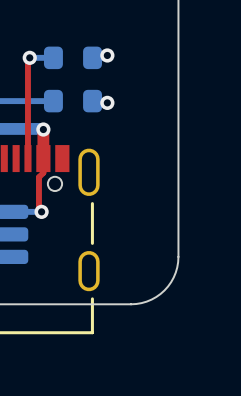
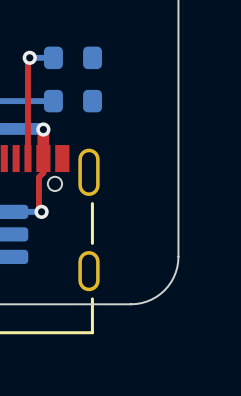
via: (107, 55) -> none
via: (107, 102) -> none

